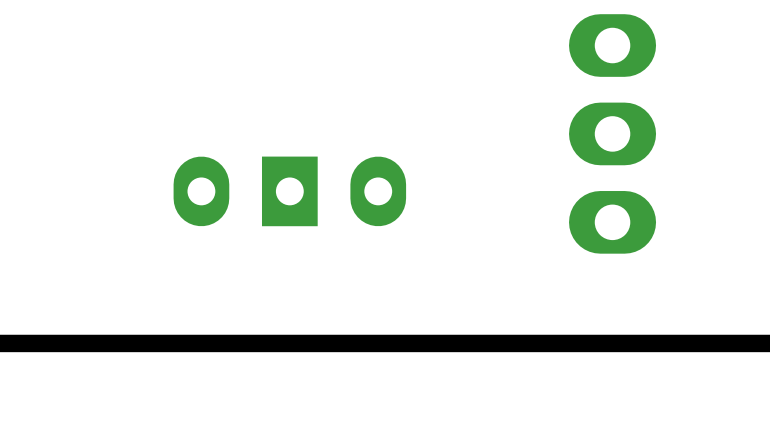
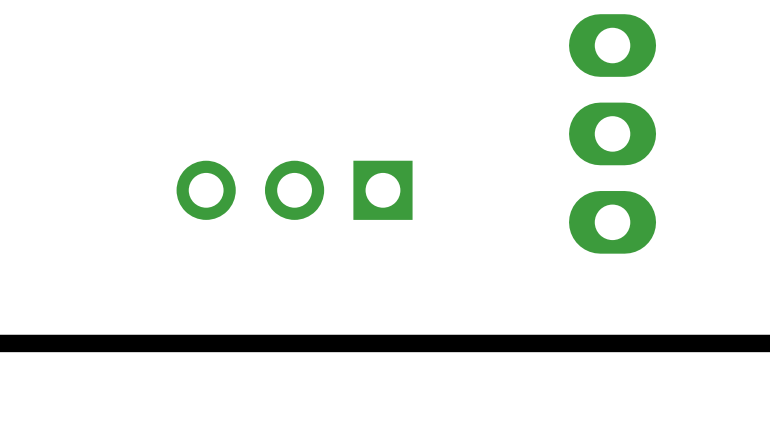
part footprint: [173, 156, 407, 227] -> [176, 160, 413, 220]

